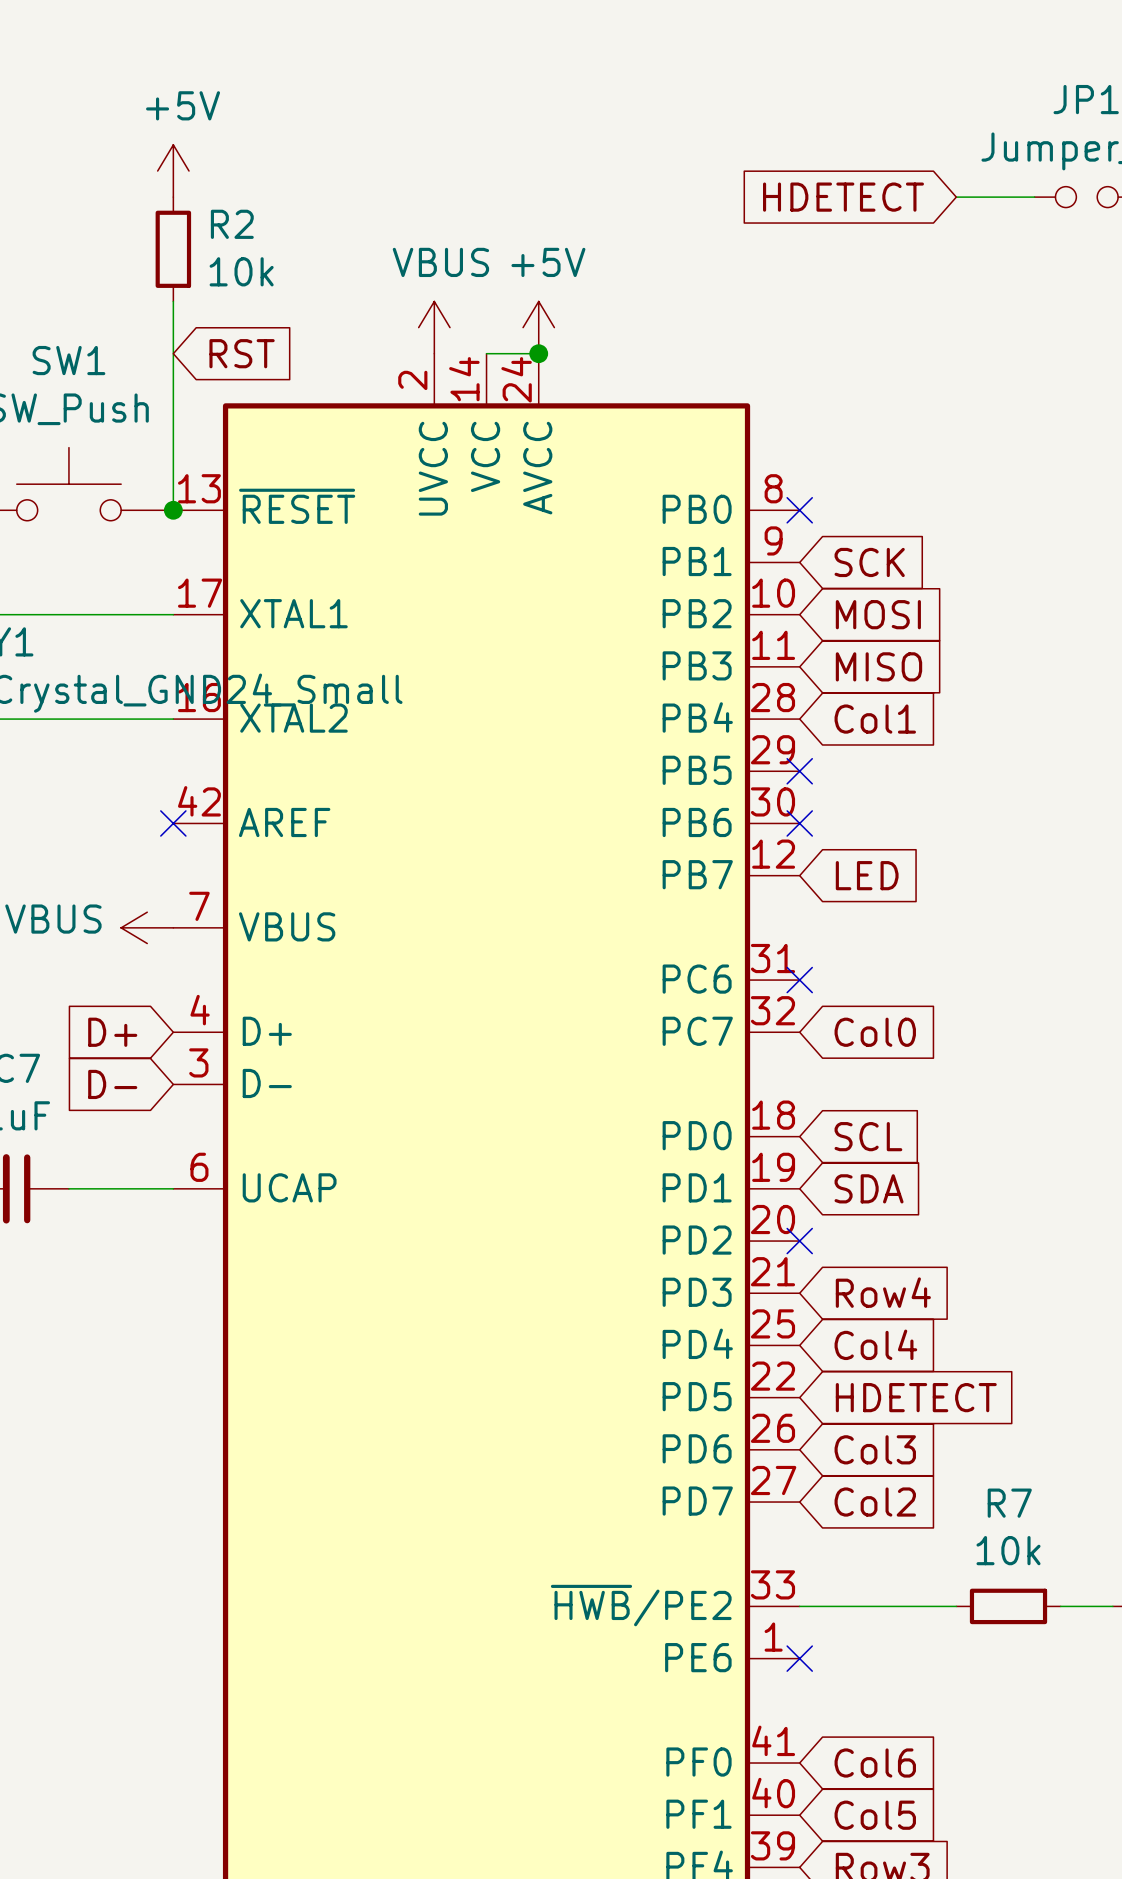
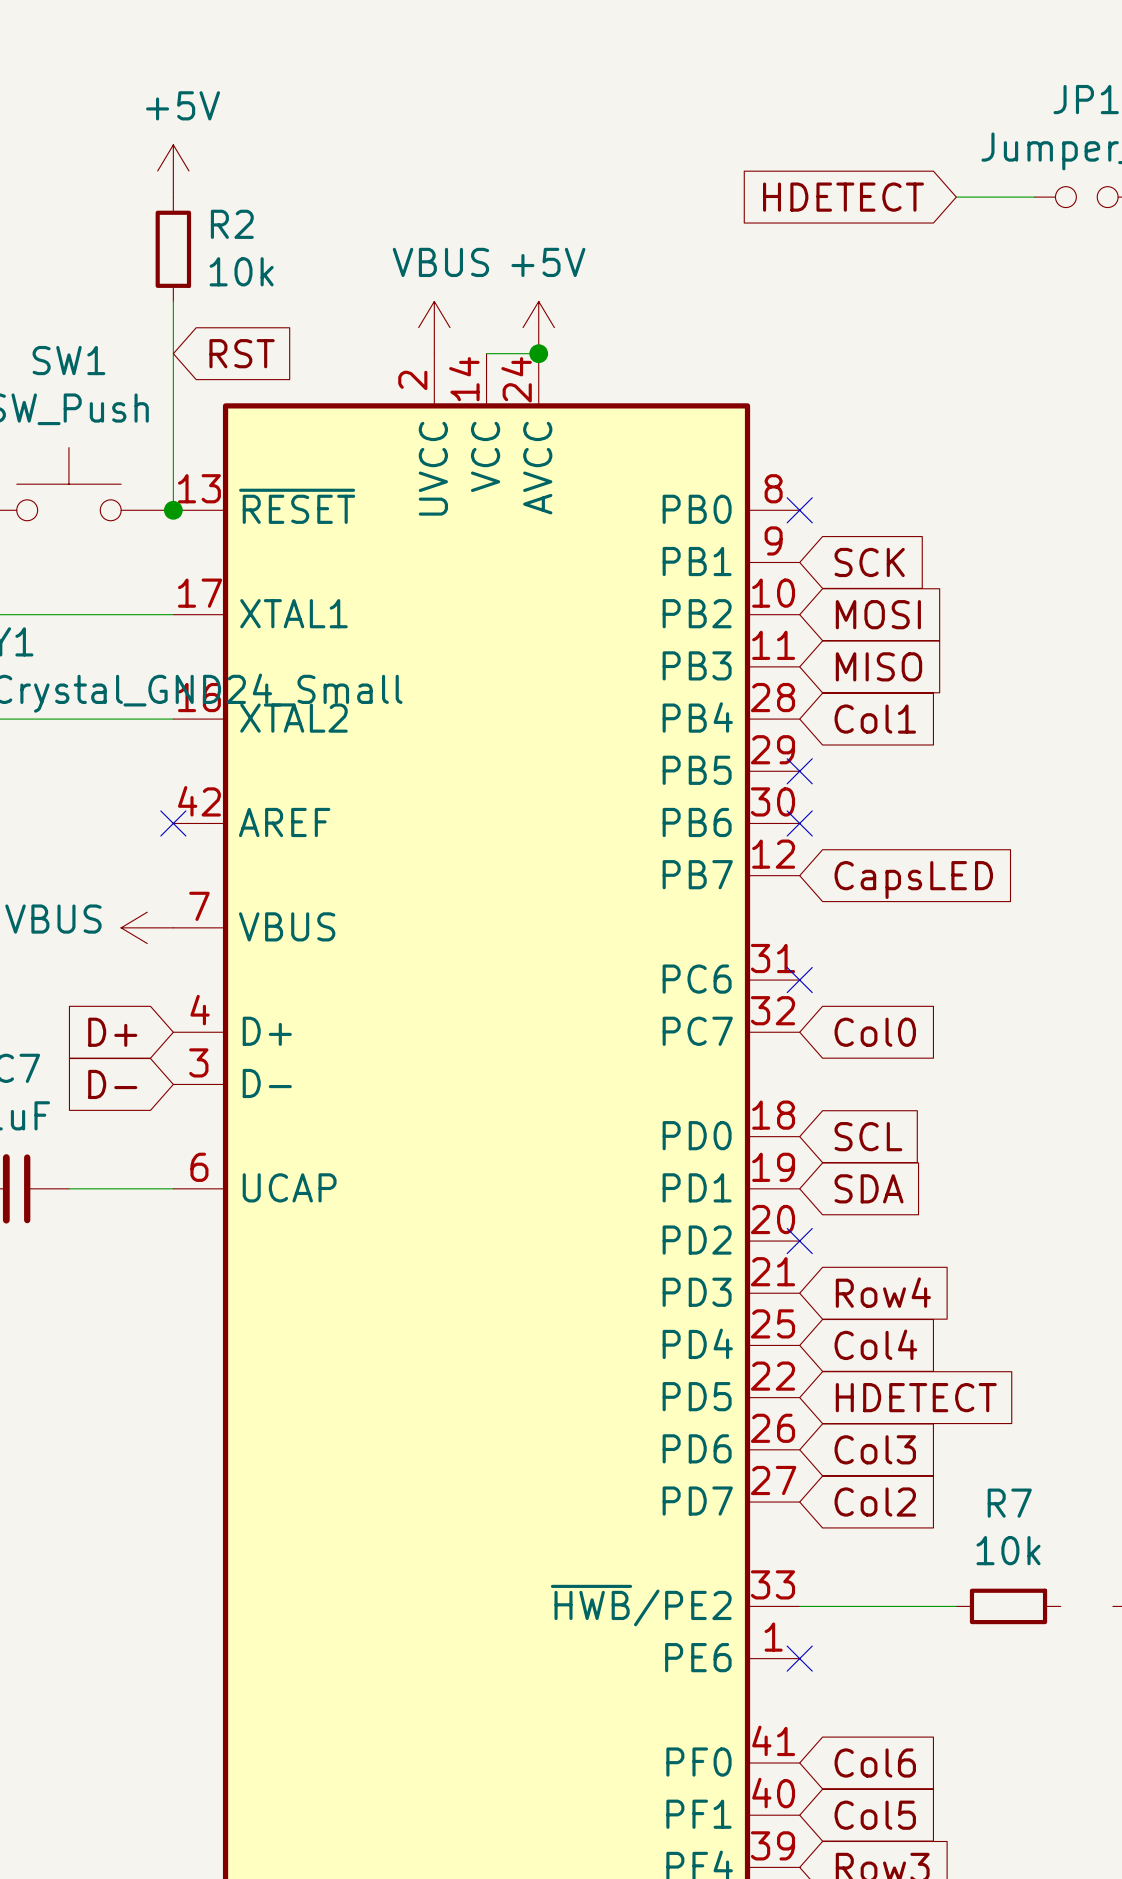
global label: LED (867, 875) -> CapsLED (913, 880)
wire: (1060, 1606) (1112, 1606) -> none

